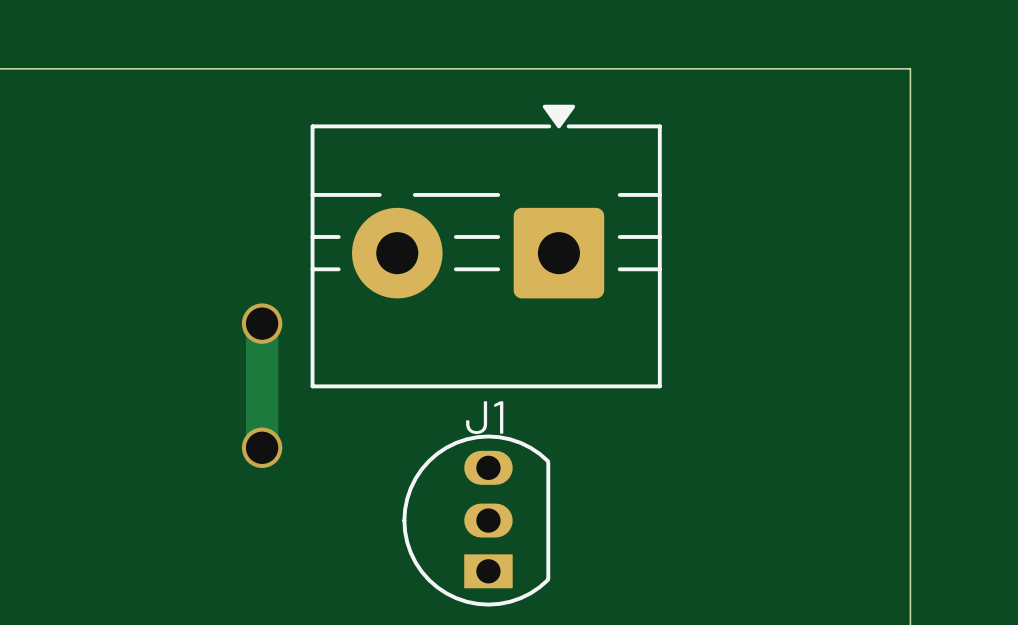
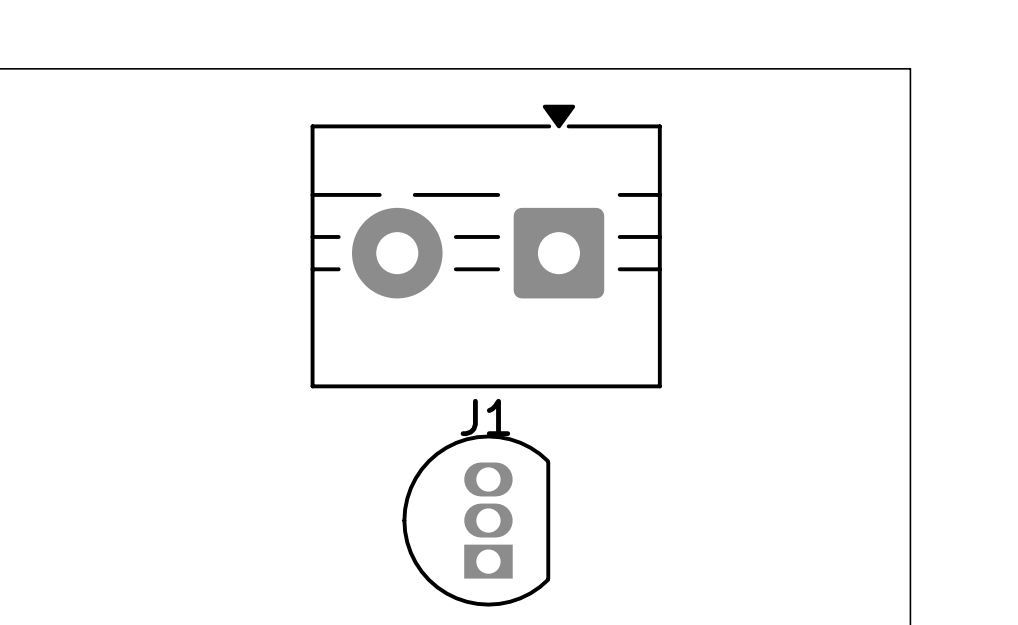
track: (262, 323) (262, 447) -> none
via: (262, 323) -> none
part footprint: [402, 434, 551, 607] -> [402, 434, 551, 607]
via: (262, 447) -> none

